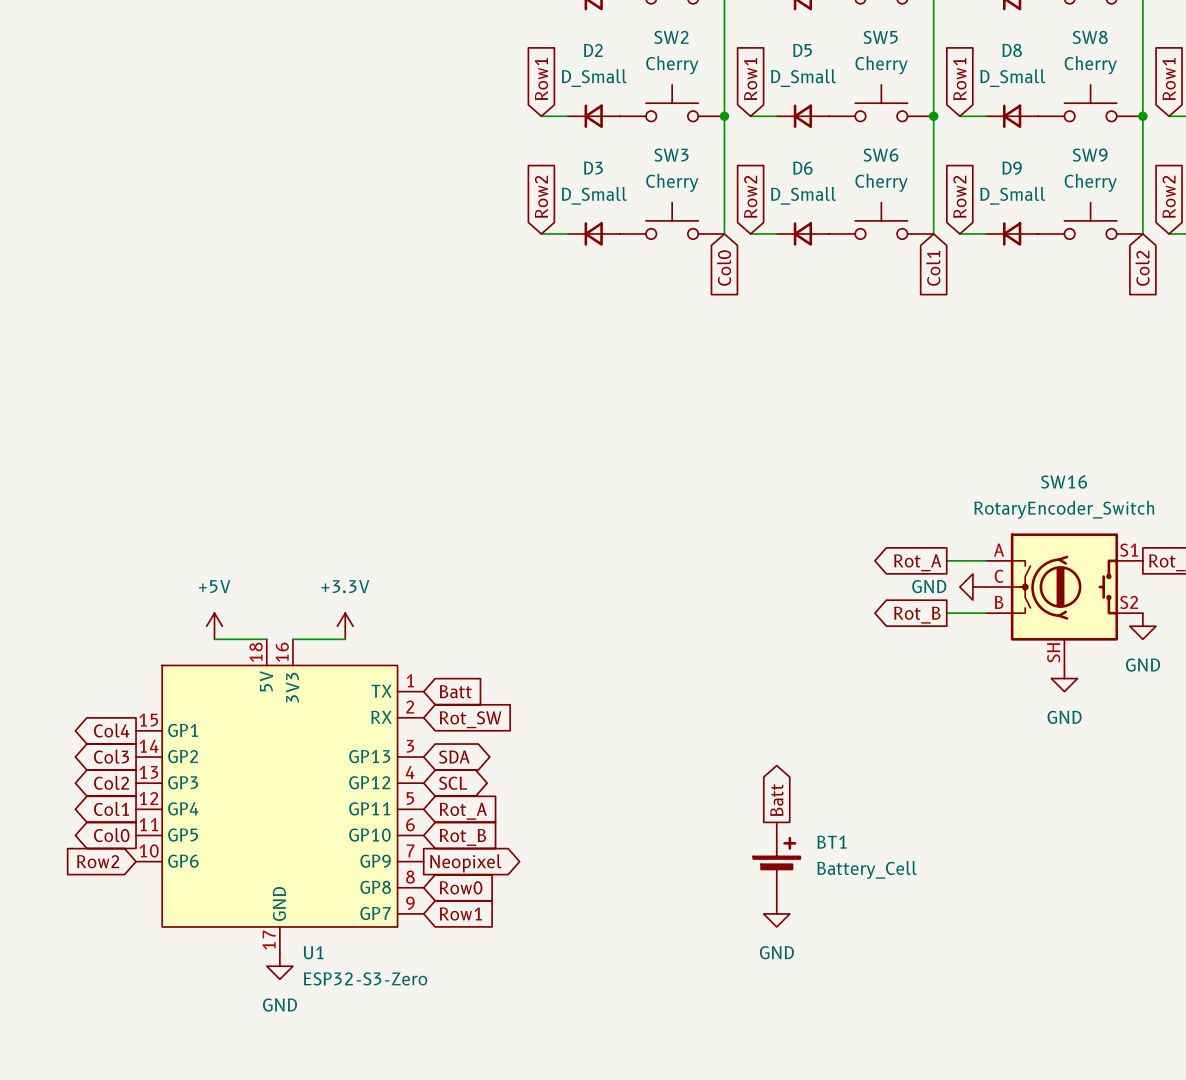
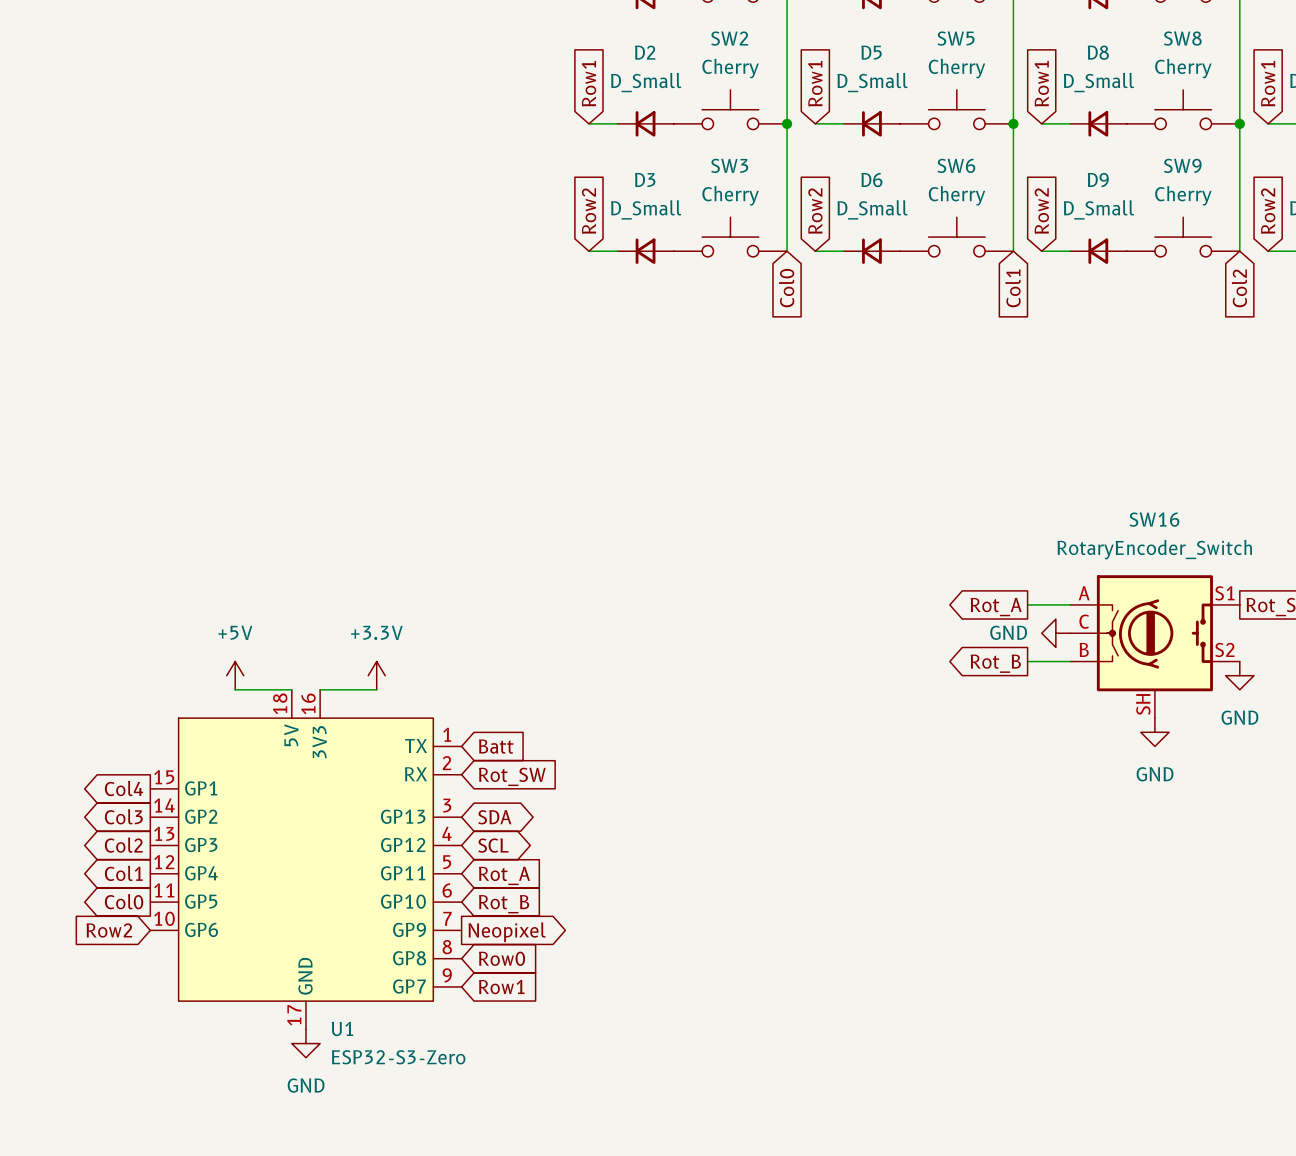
global label: Batt (776, 800) -> none
BT1: Battery_Cell (776, 861) -> none
power symbol: GND (776, 913) -> none

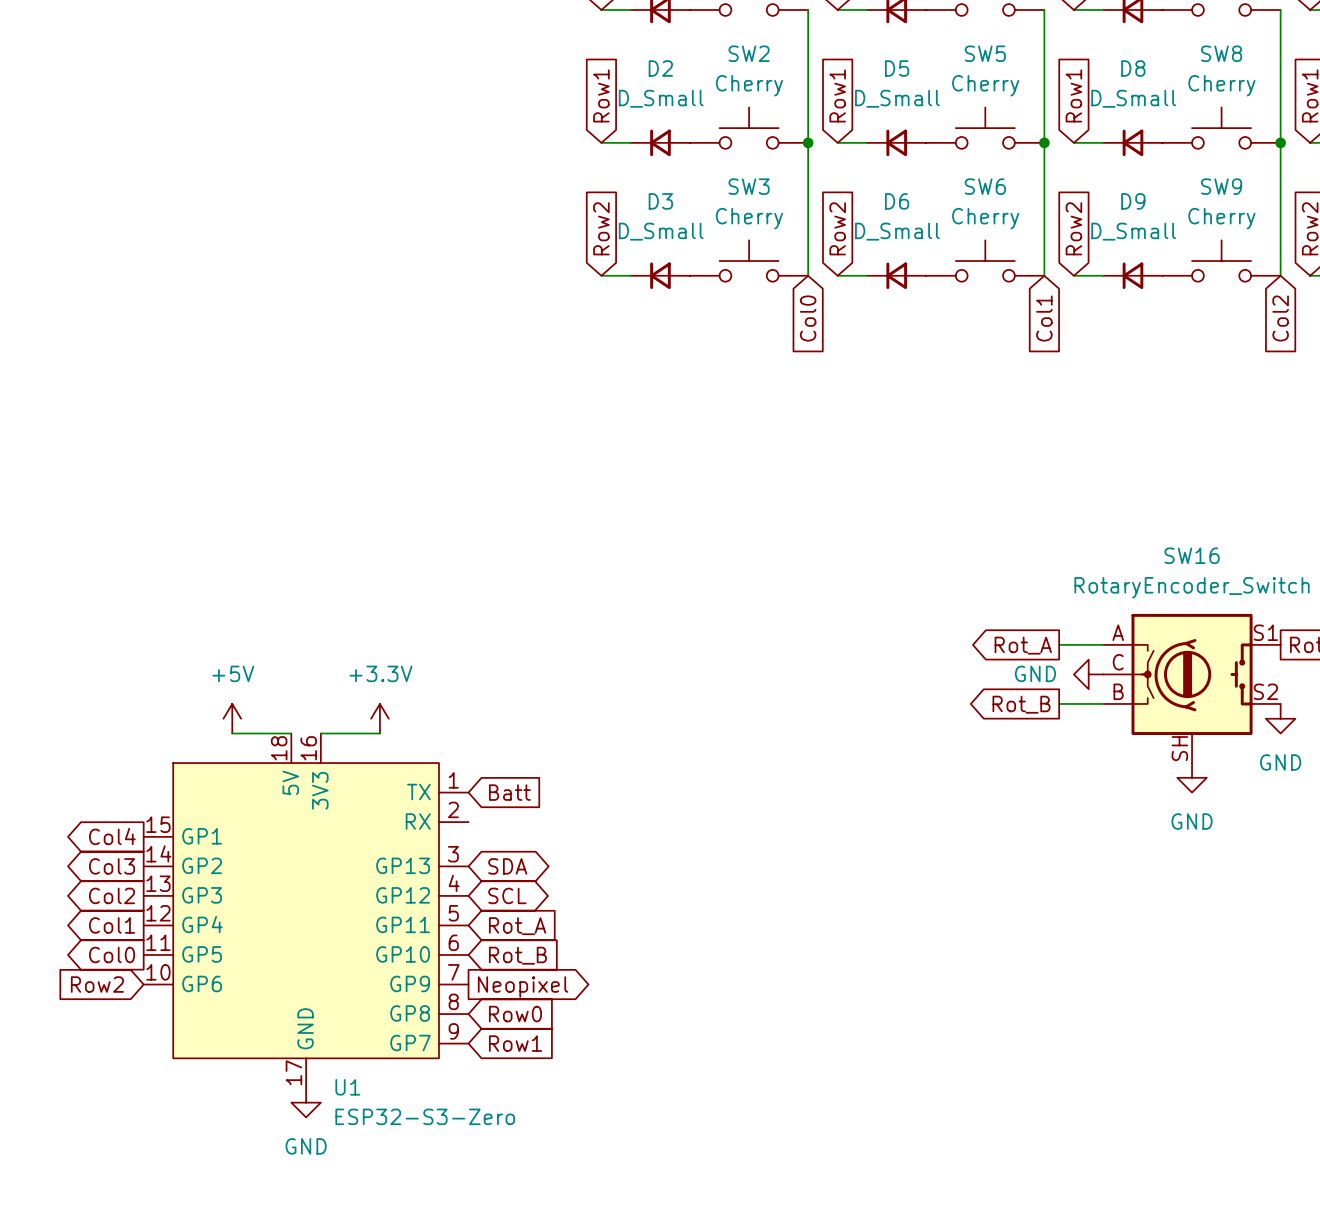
global label: Rot_SW (512, 776) -> none

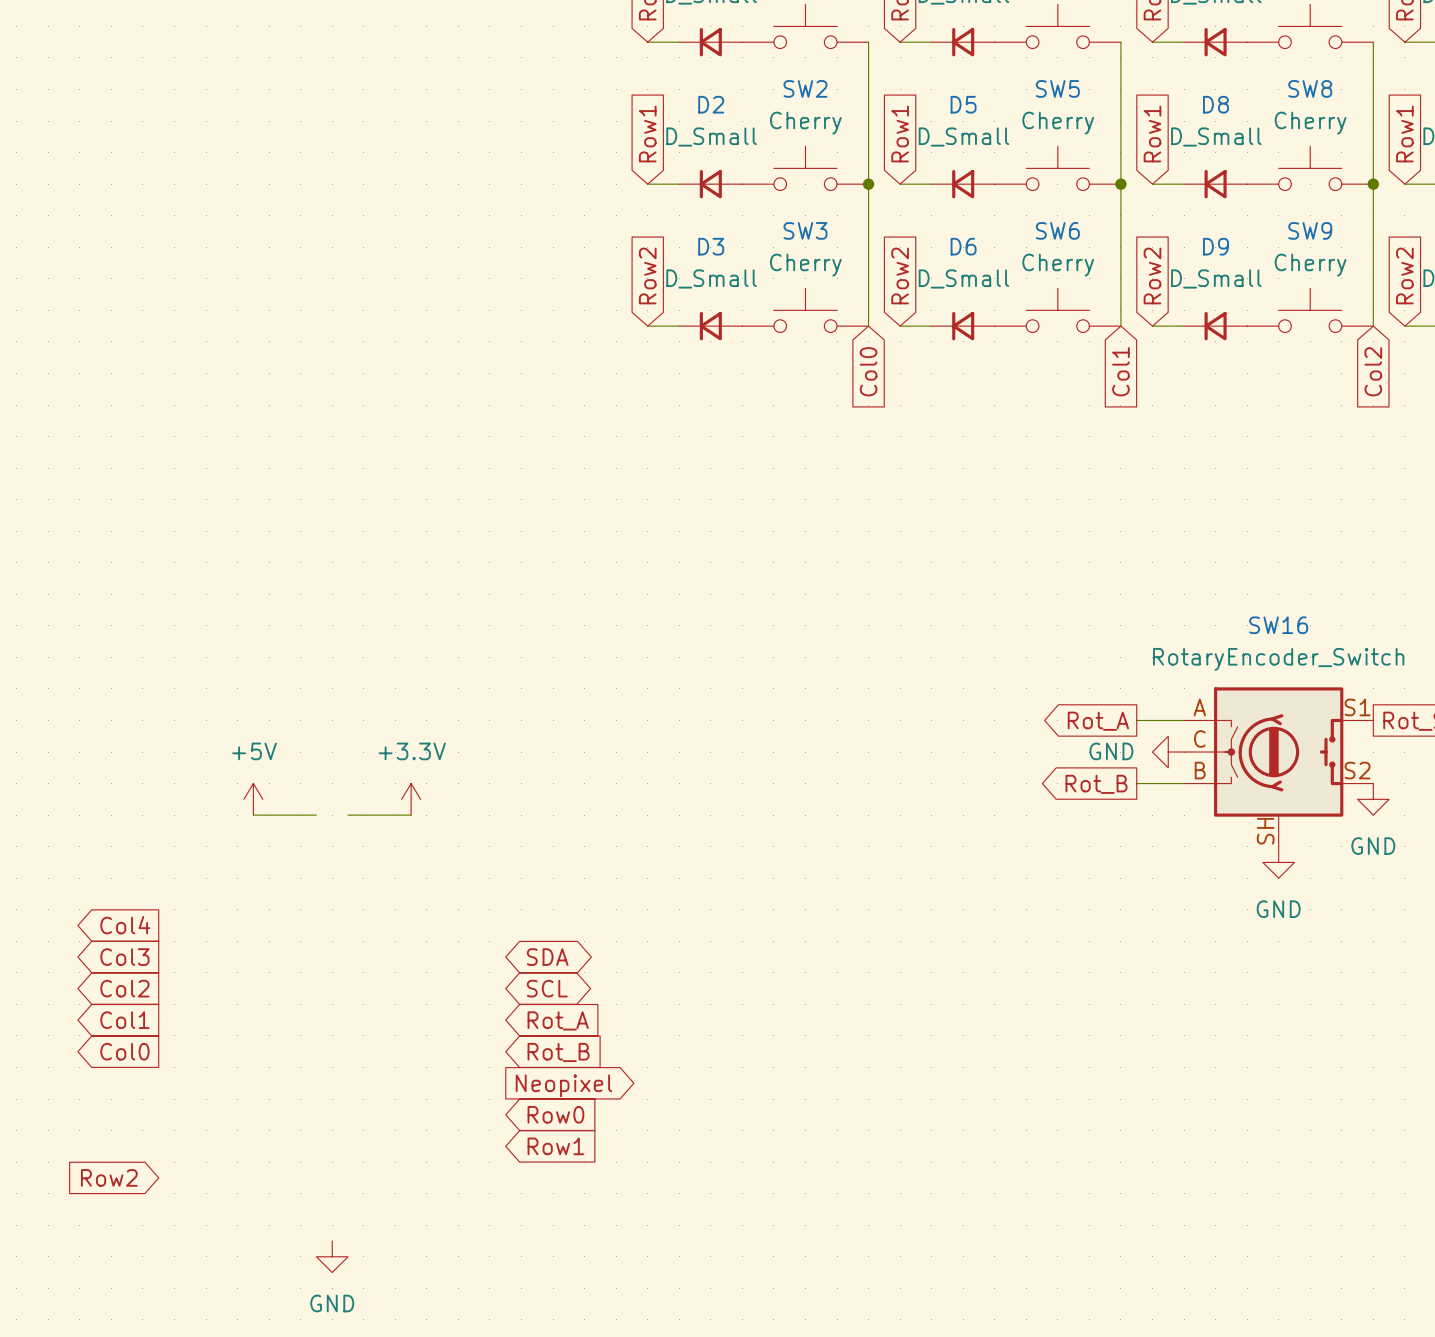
global label: Batt (509, 792) -> none
U1: ESP32-S3-Zero (306, 910) -> none
global label position: Row2 (97, 984) -> Row2 (109, 1177)
power symbol position: GND (306, 1102) -> GND (332, 1256)

